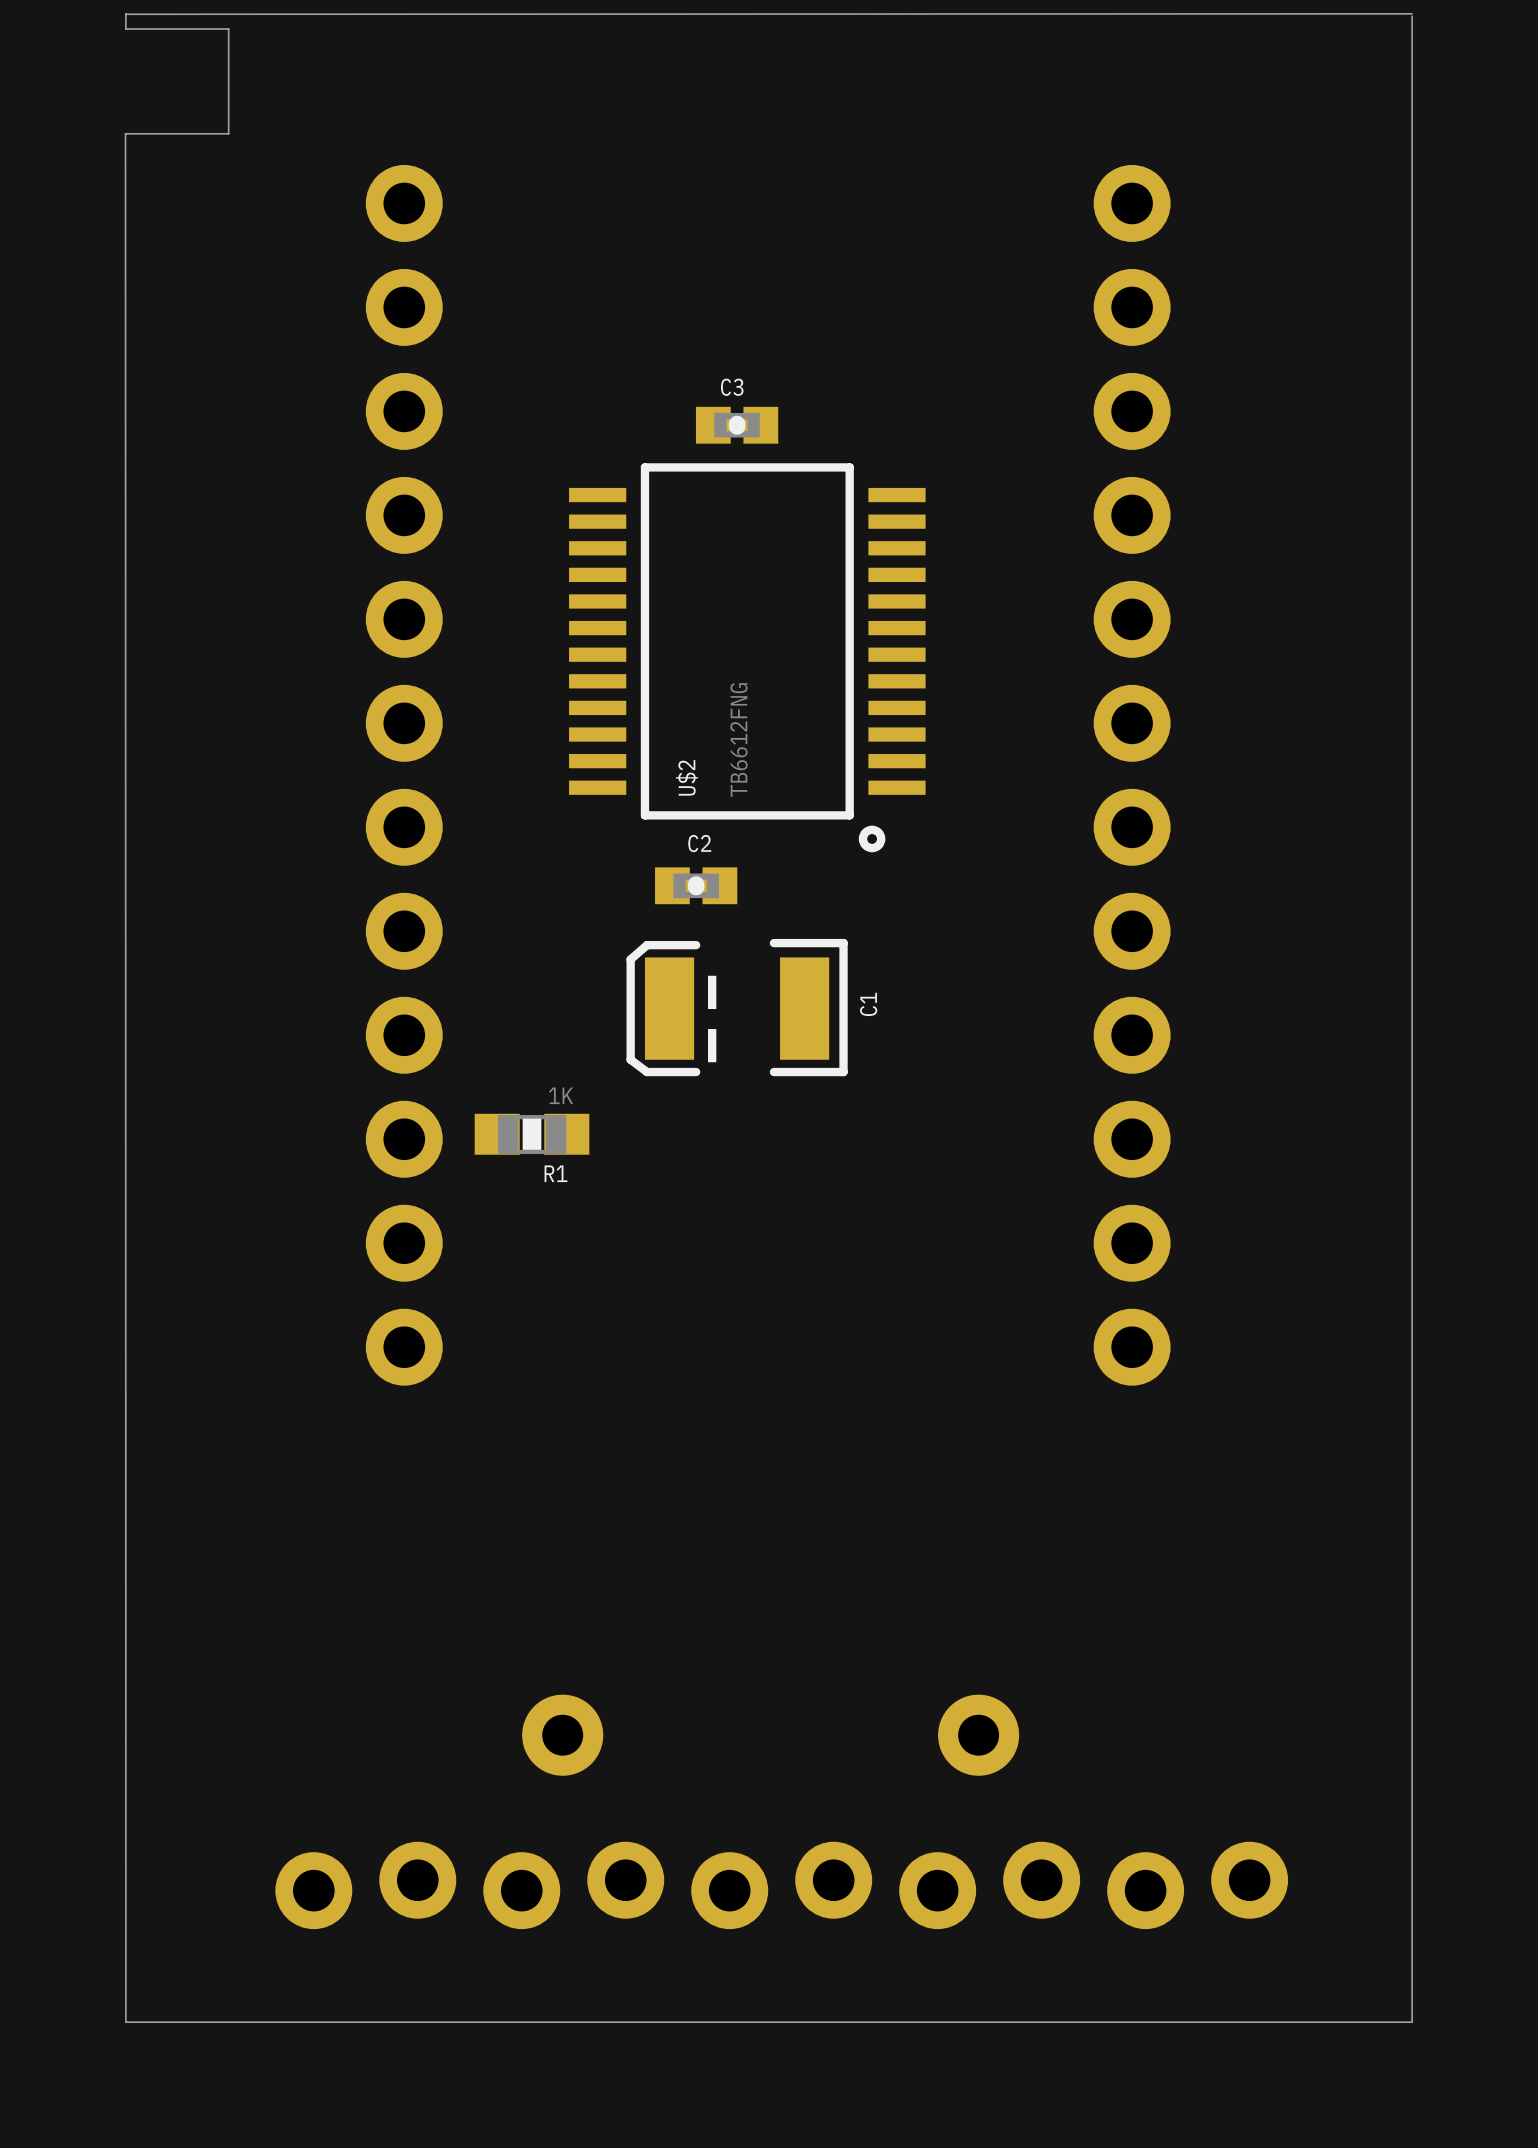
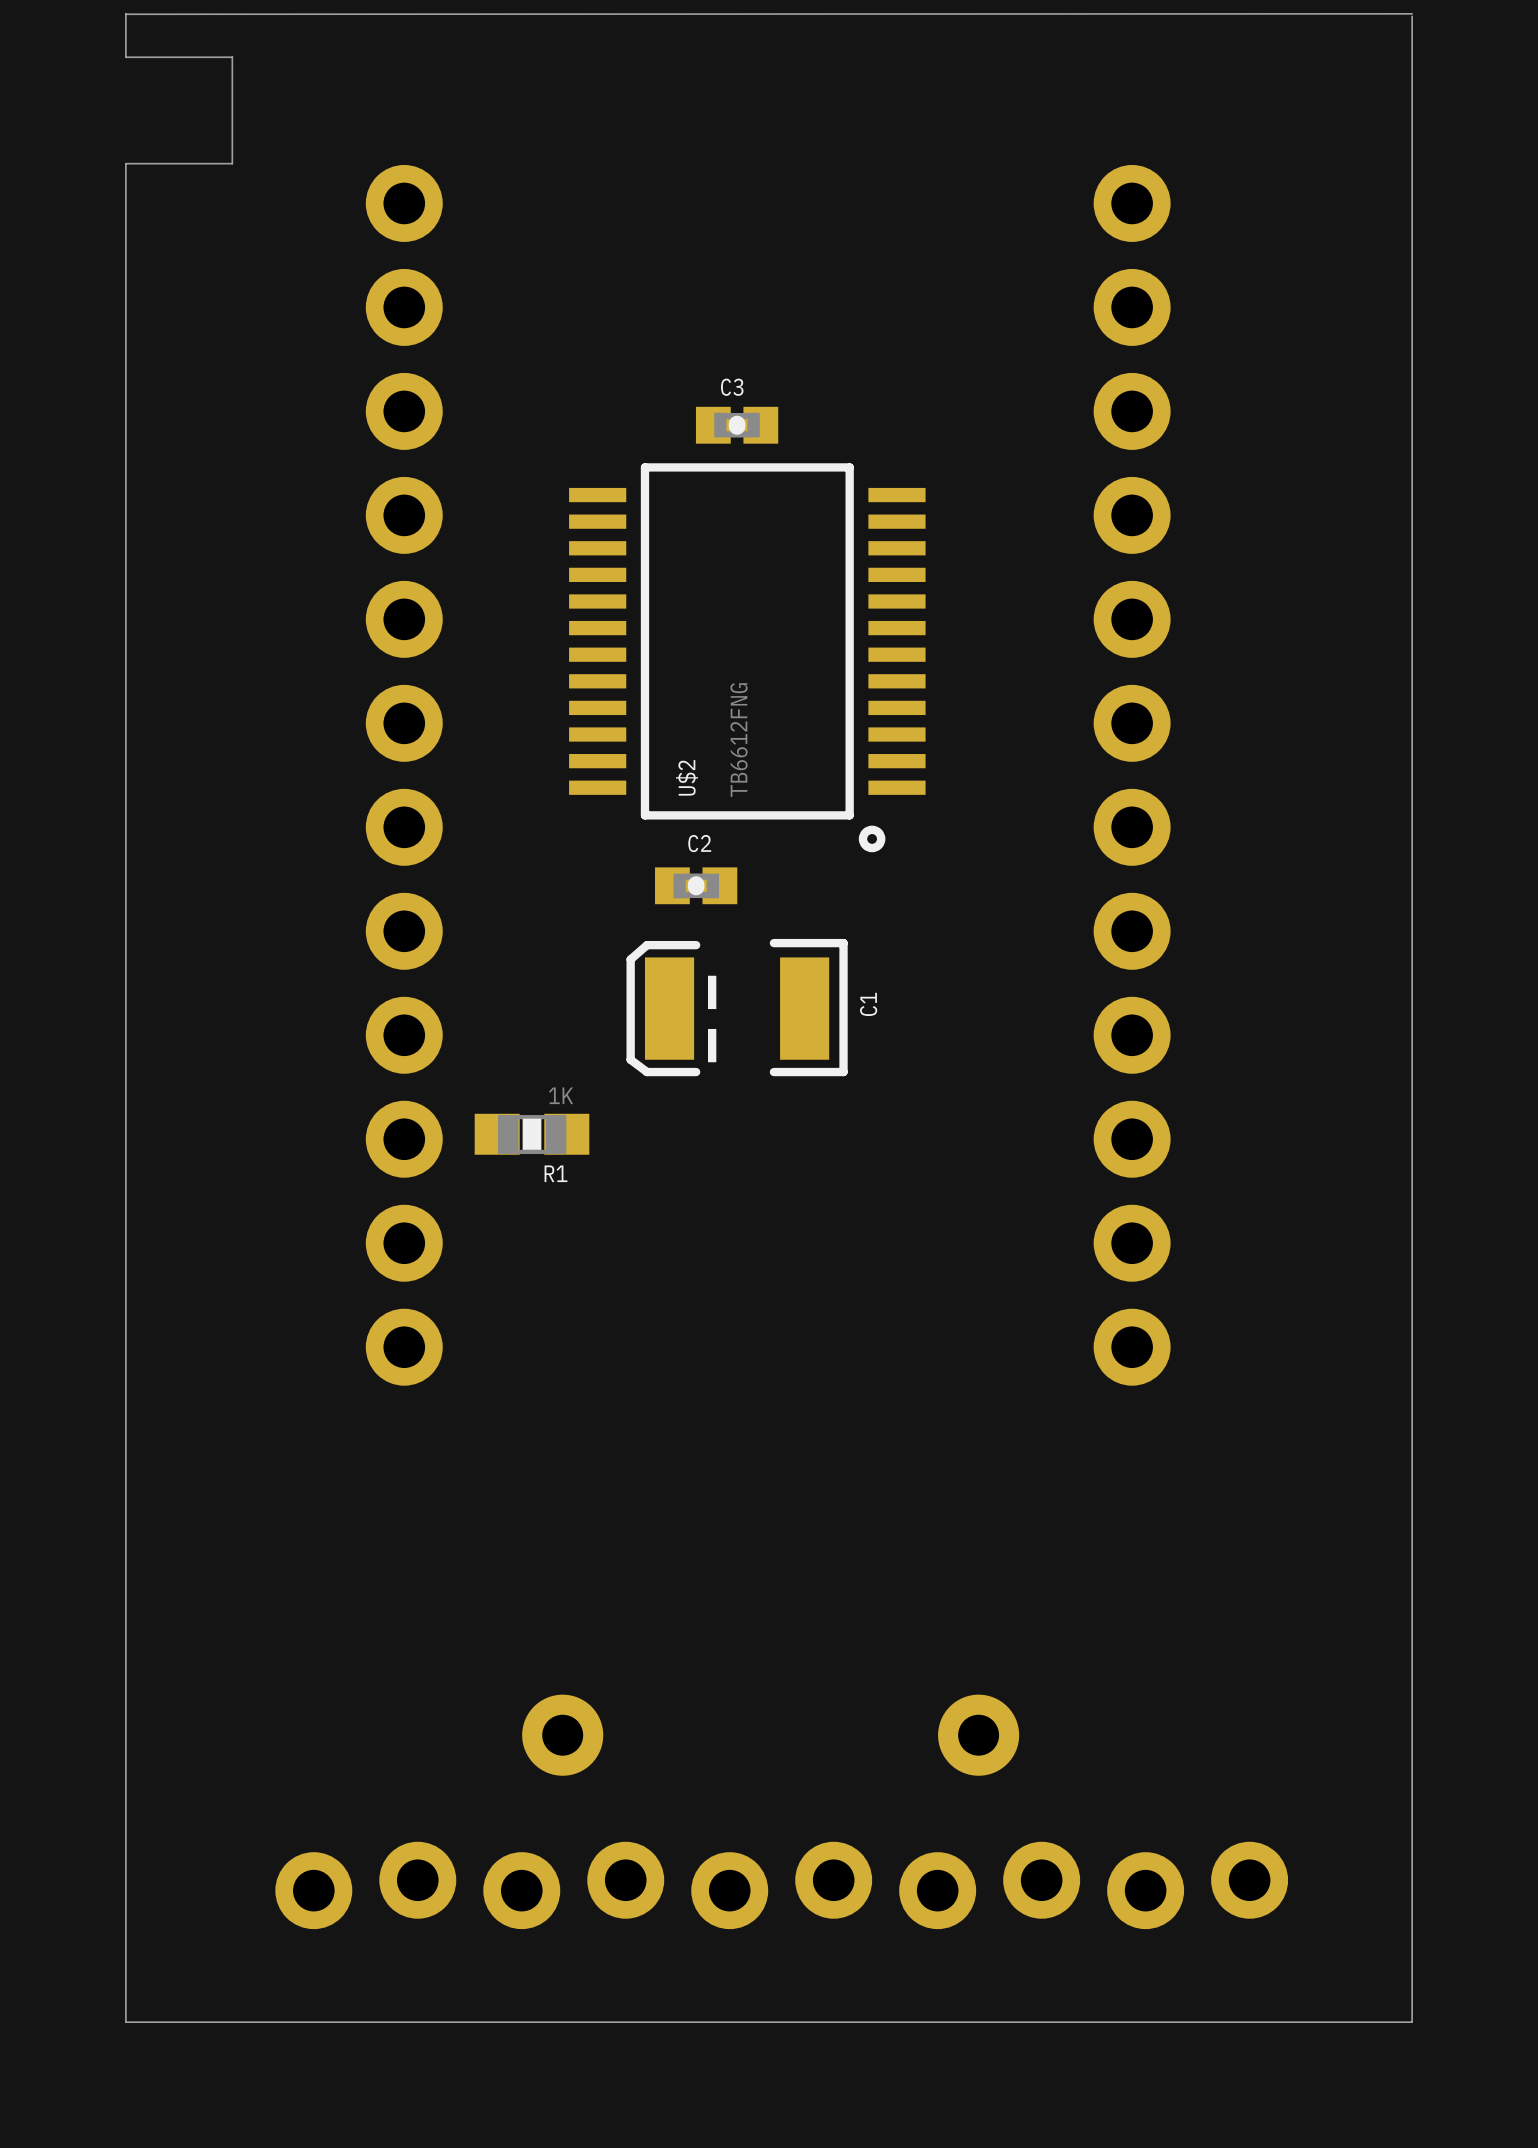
board edge: (125, 28) (228, 28) (228, 133) (125, 133) (125, 2022) -> (125, 28) (125, 57) (232, 57) (232, 163) (125, 163) (125, 2022)

